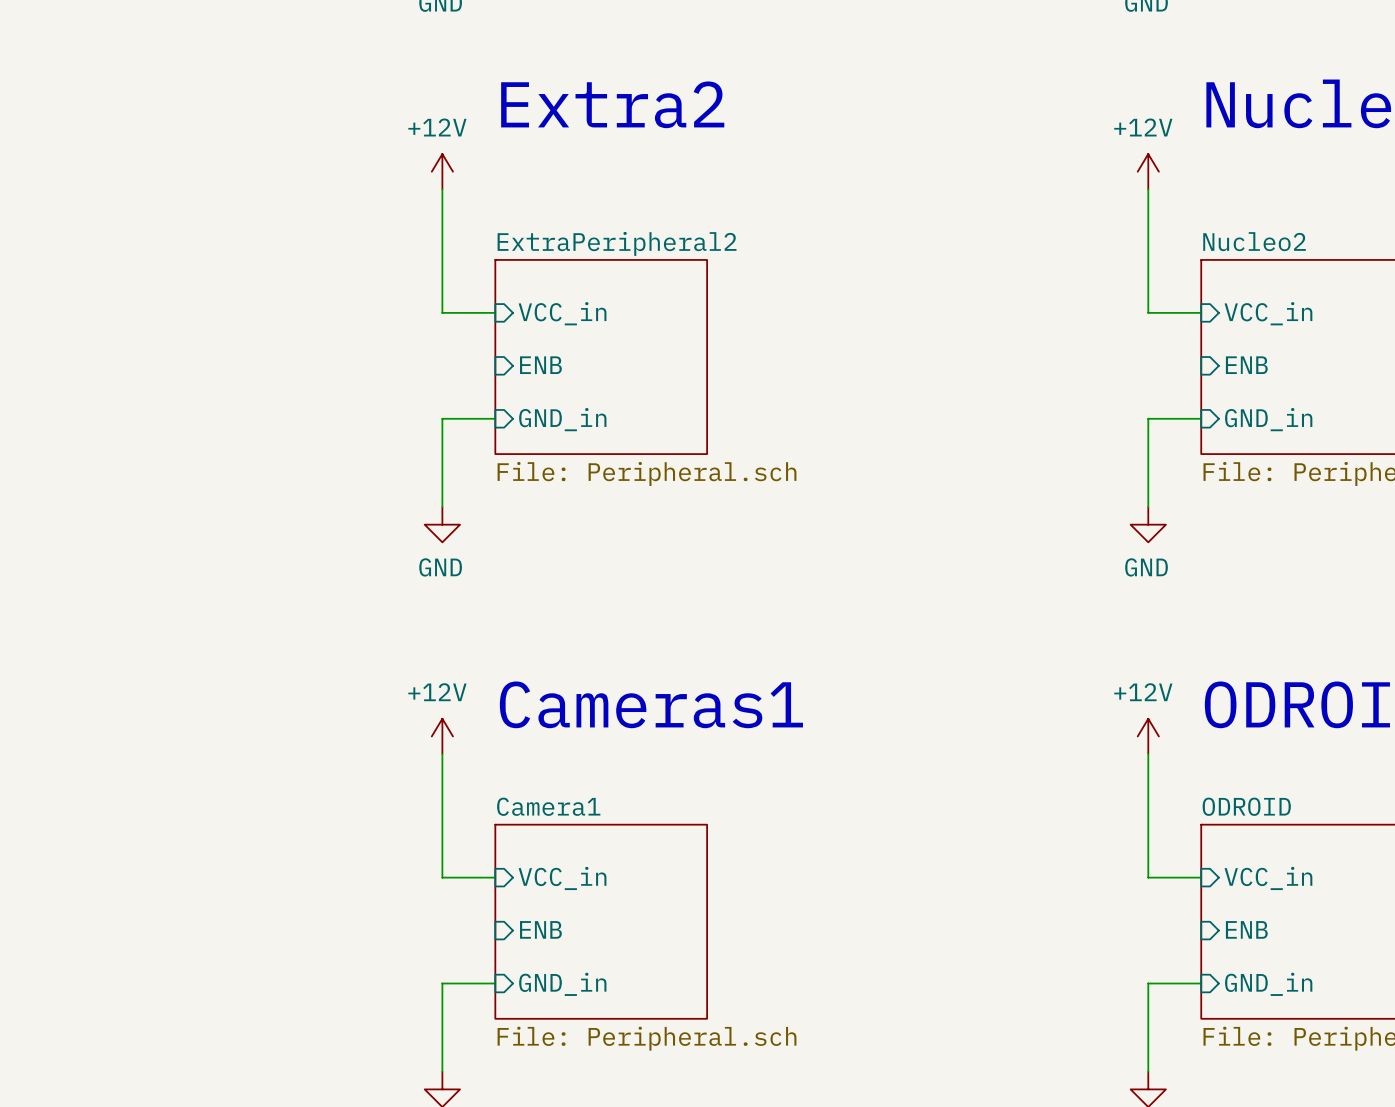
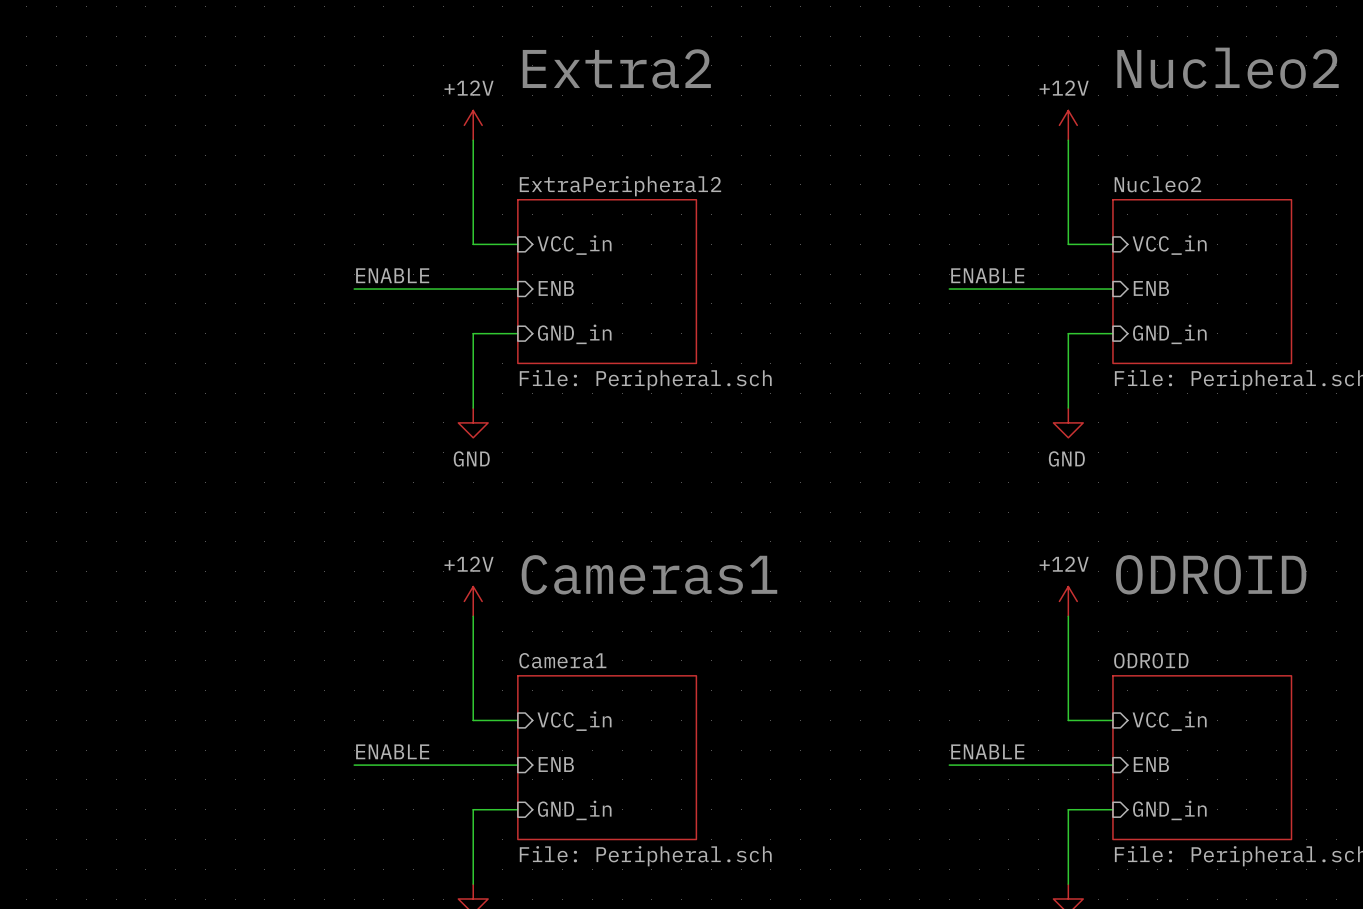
label: none -> ENABLE (392, 275)
label: none -> ENABLE (987, 275)
wire: none -> (354, 289) (517, 289)
wire: none -> (949, 289) (1112, 289)
label: none -> ENABLE (392, 751)
label: none -> ENABLE (987, 751)
wire: none -> (354, 765) (517, 765)
wire: none -> (949, 765) (1112, 765)

